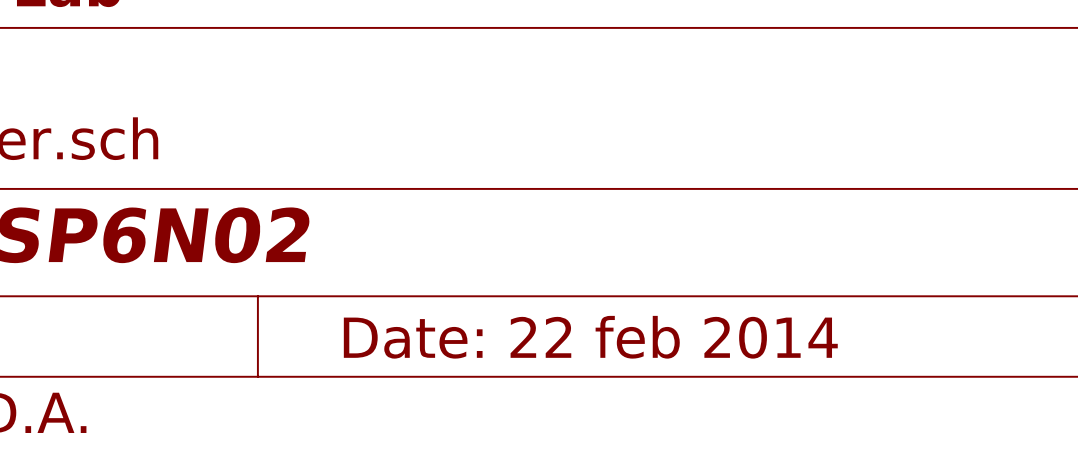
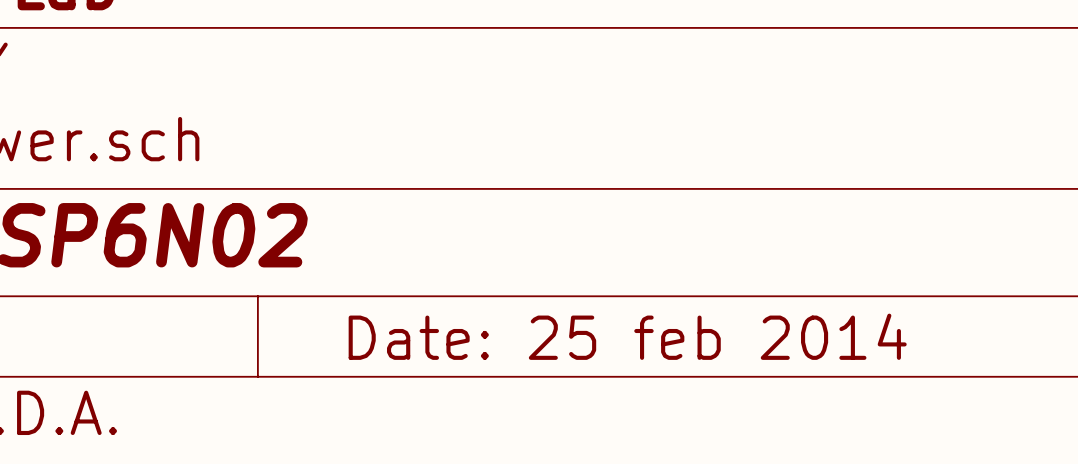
title block: Date: 22 feb 2014 (590, 337) -> Date: 25 feb 2014 (627, 336)

